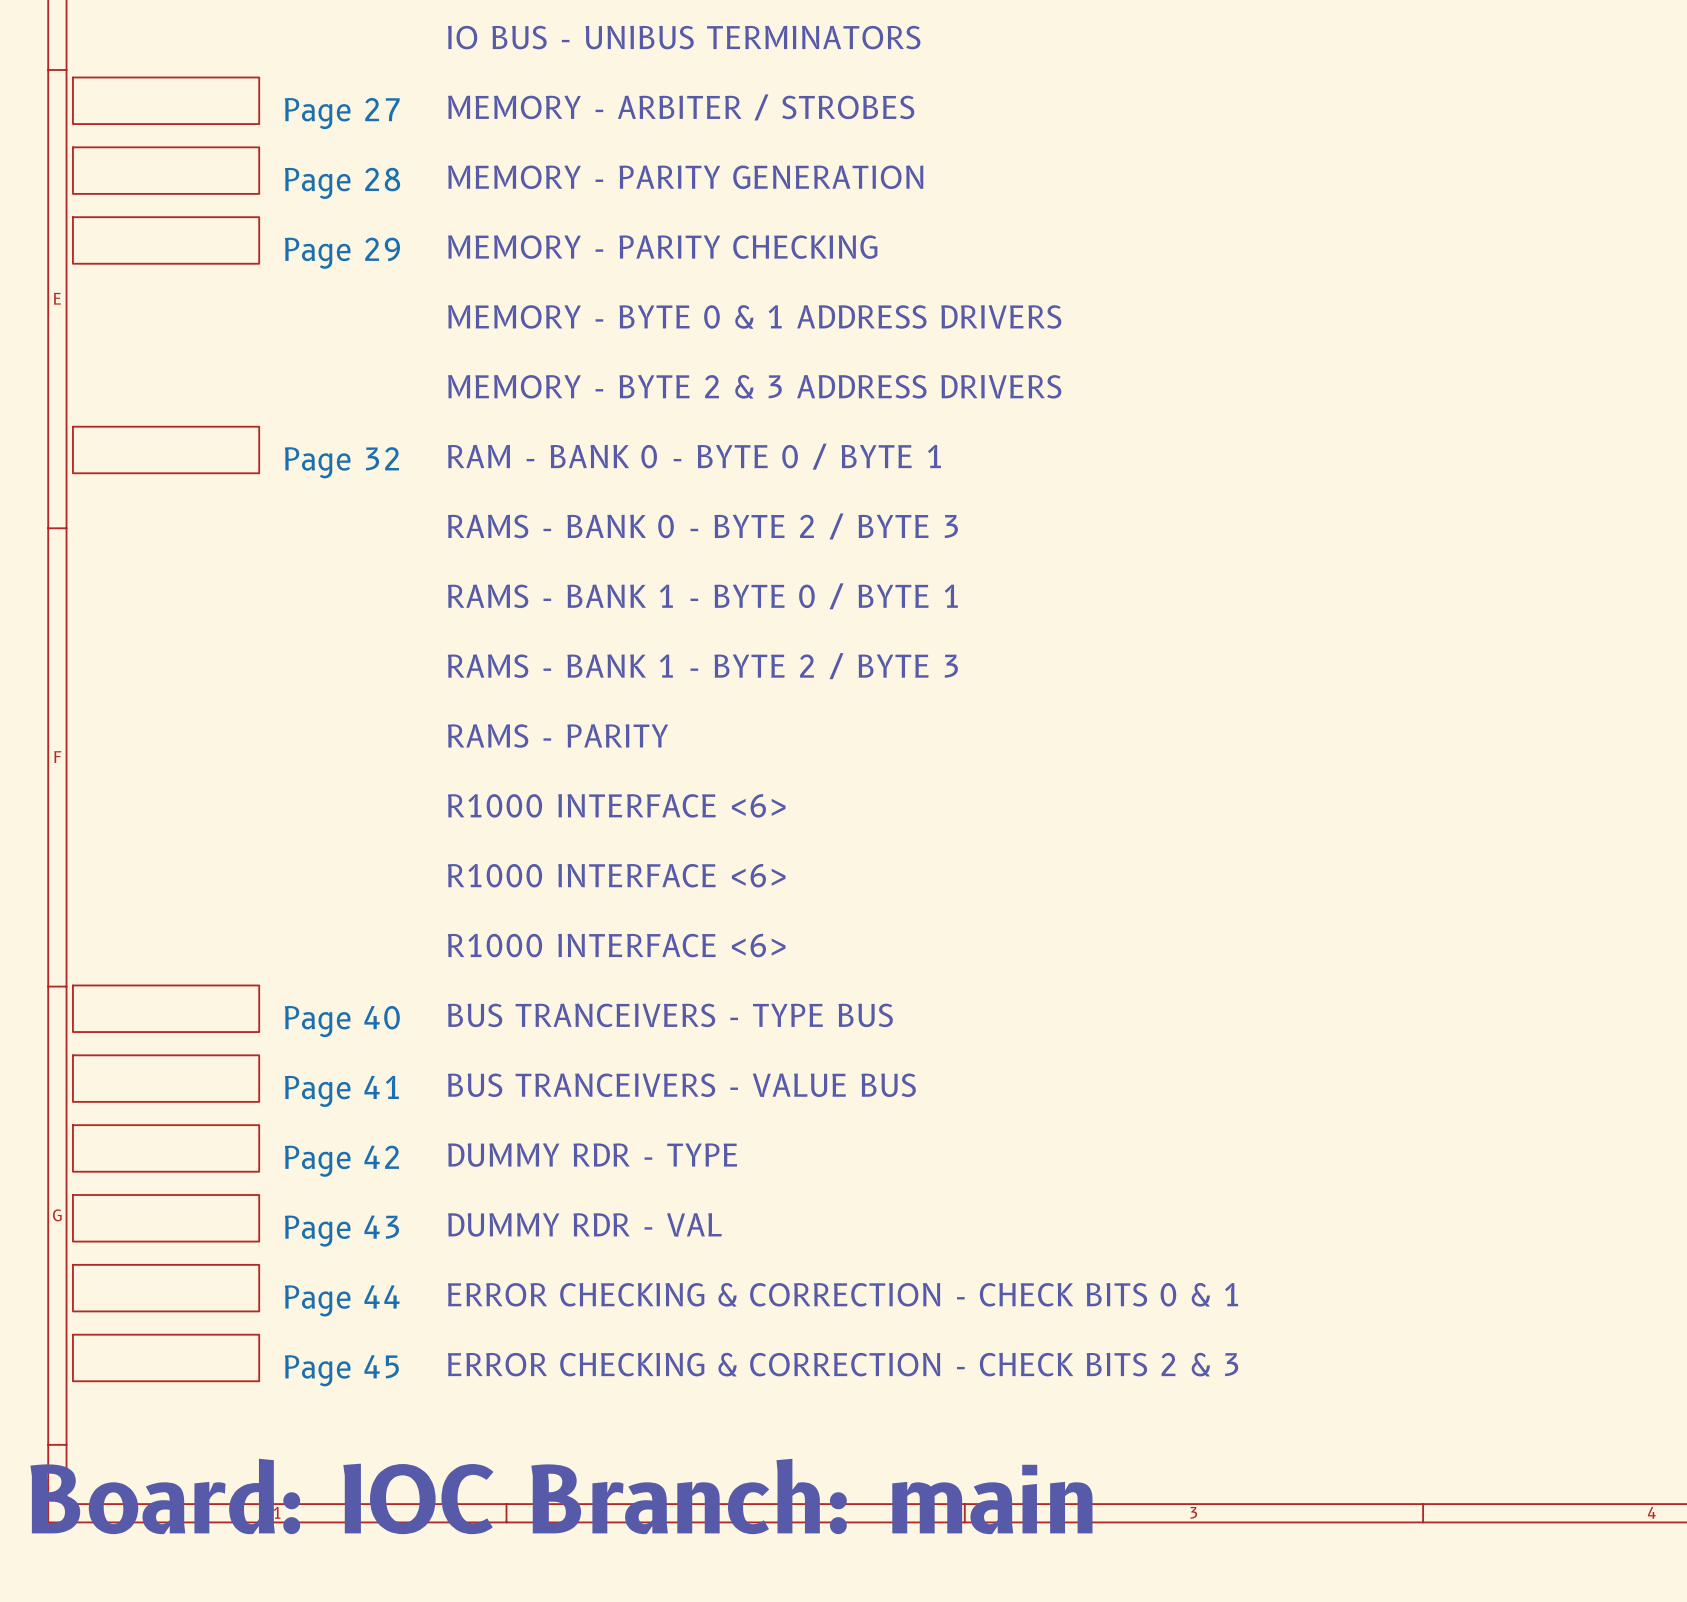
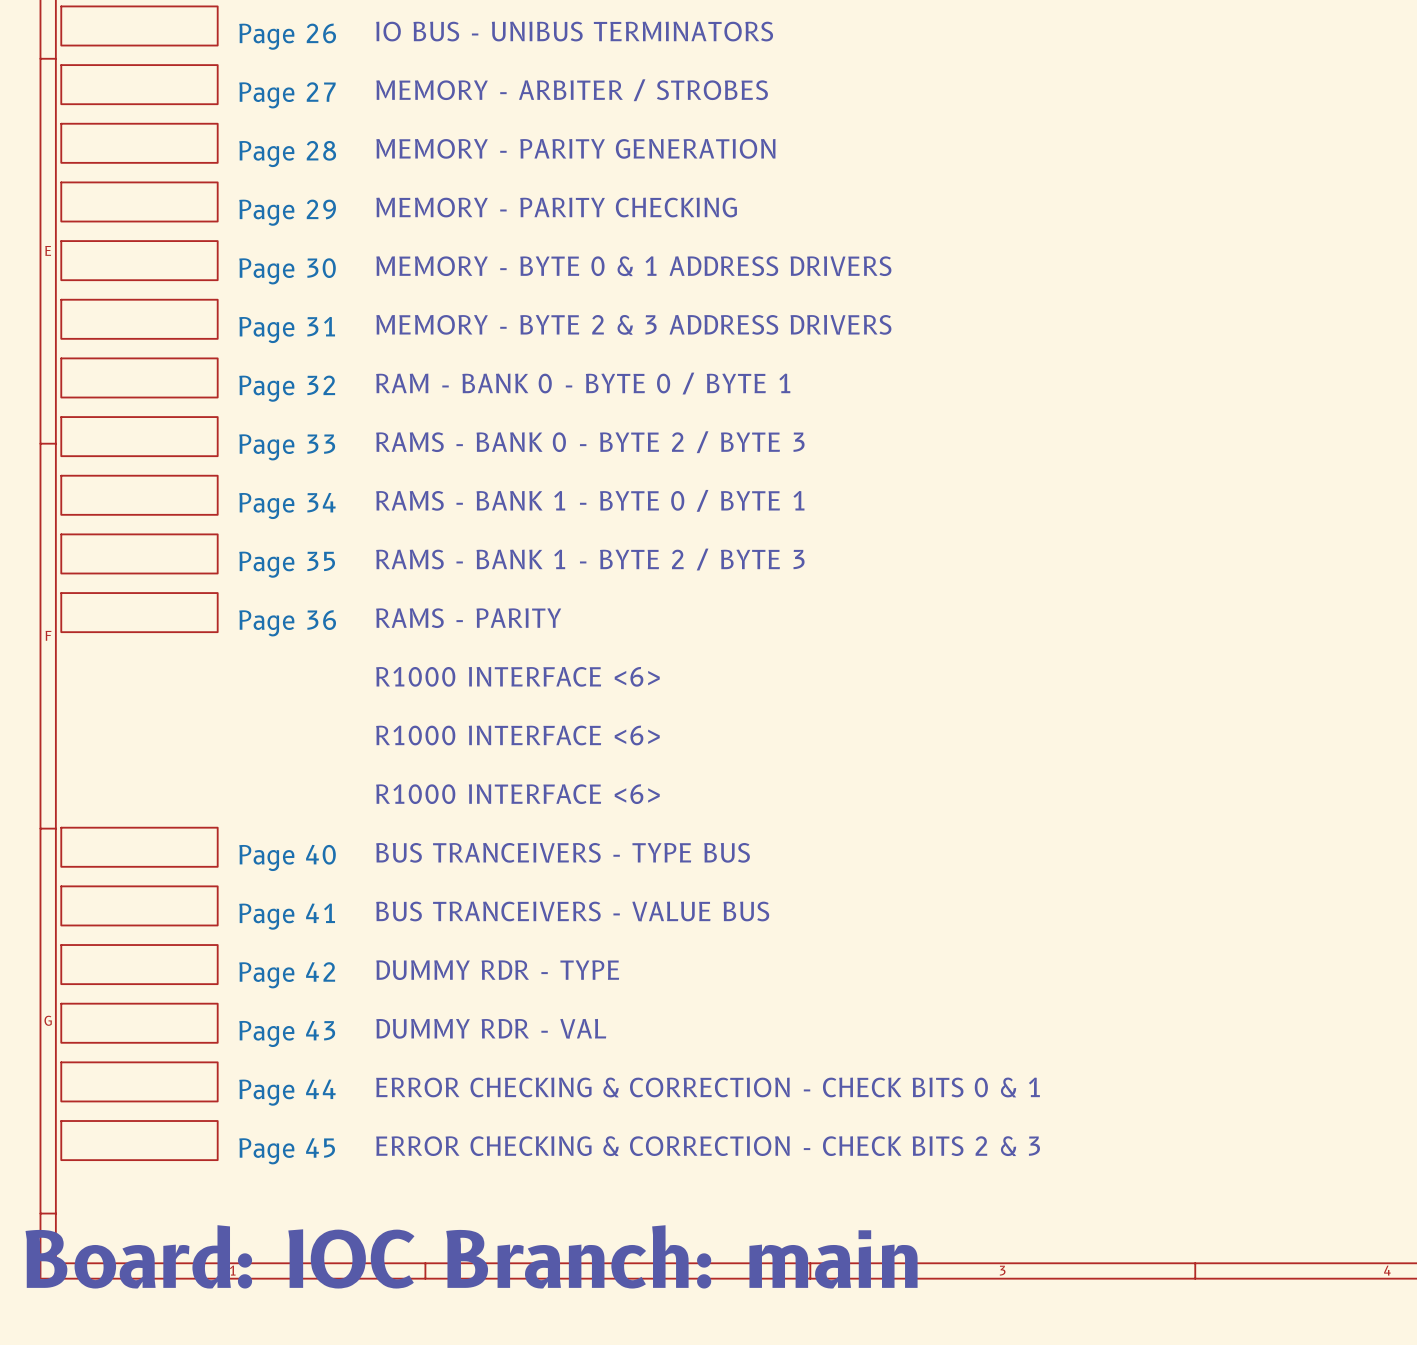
sheet Page 26: none -> (139, 25)
sheet Page 30: none -> (139, 260)
sheet Page 31: none -> (139, 319)
sheet Page 33: none -> (139, 436)
sheet Page 34: none -> (139, 495)
sheet Page 35: none -> (139, 553)
sheet Page 36: none -> (139, 612)

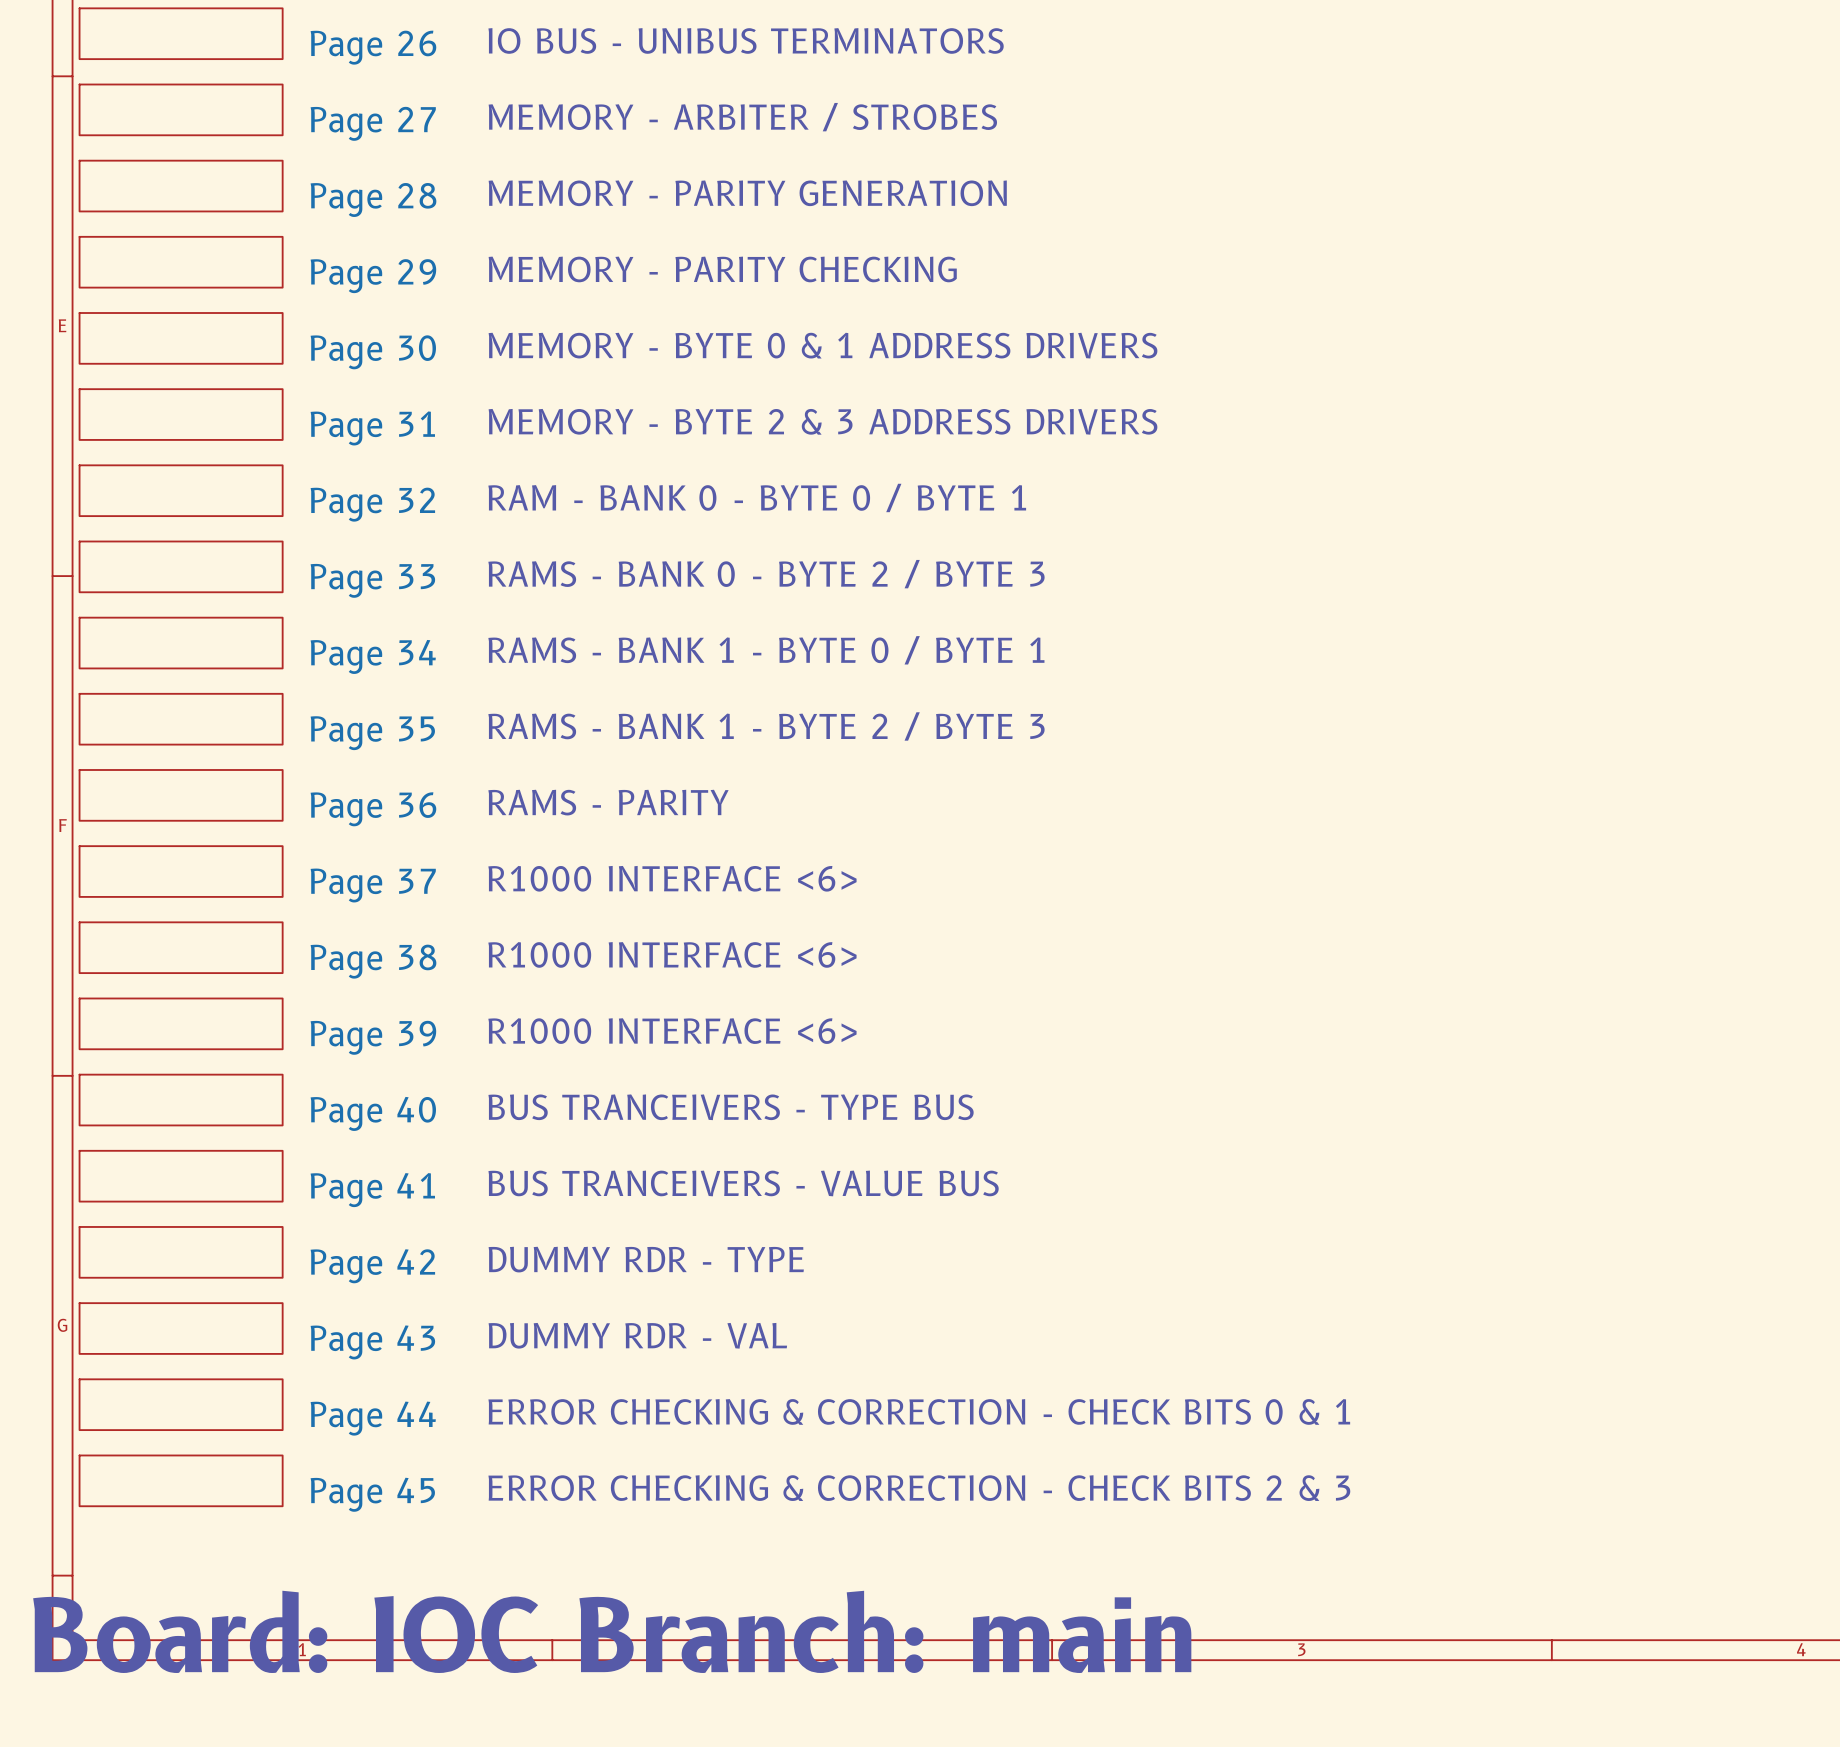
sheet Page 37: none -> (181, 871)
sheet Page 38: none -> (181, 947)
sheet Page 39: none -> (181, 1023)

